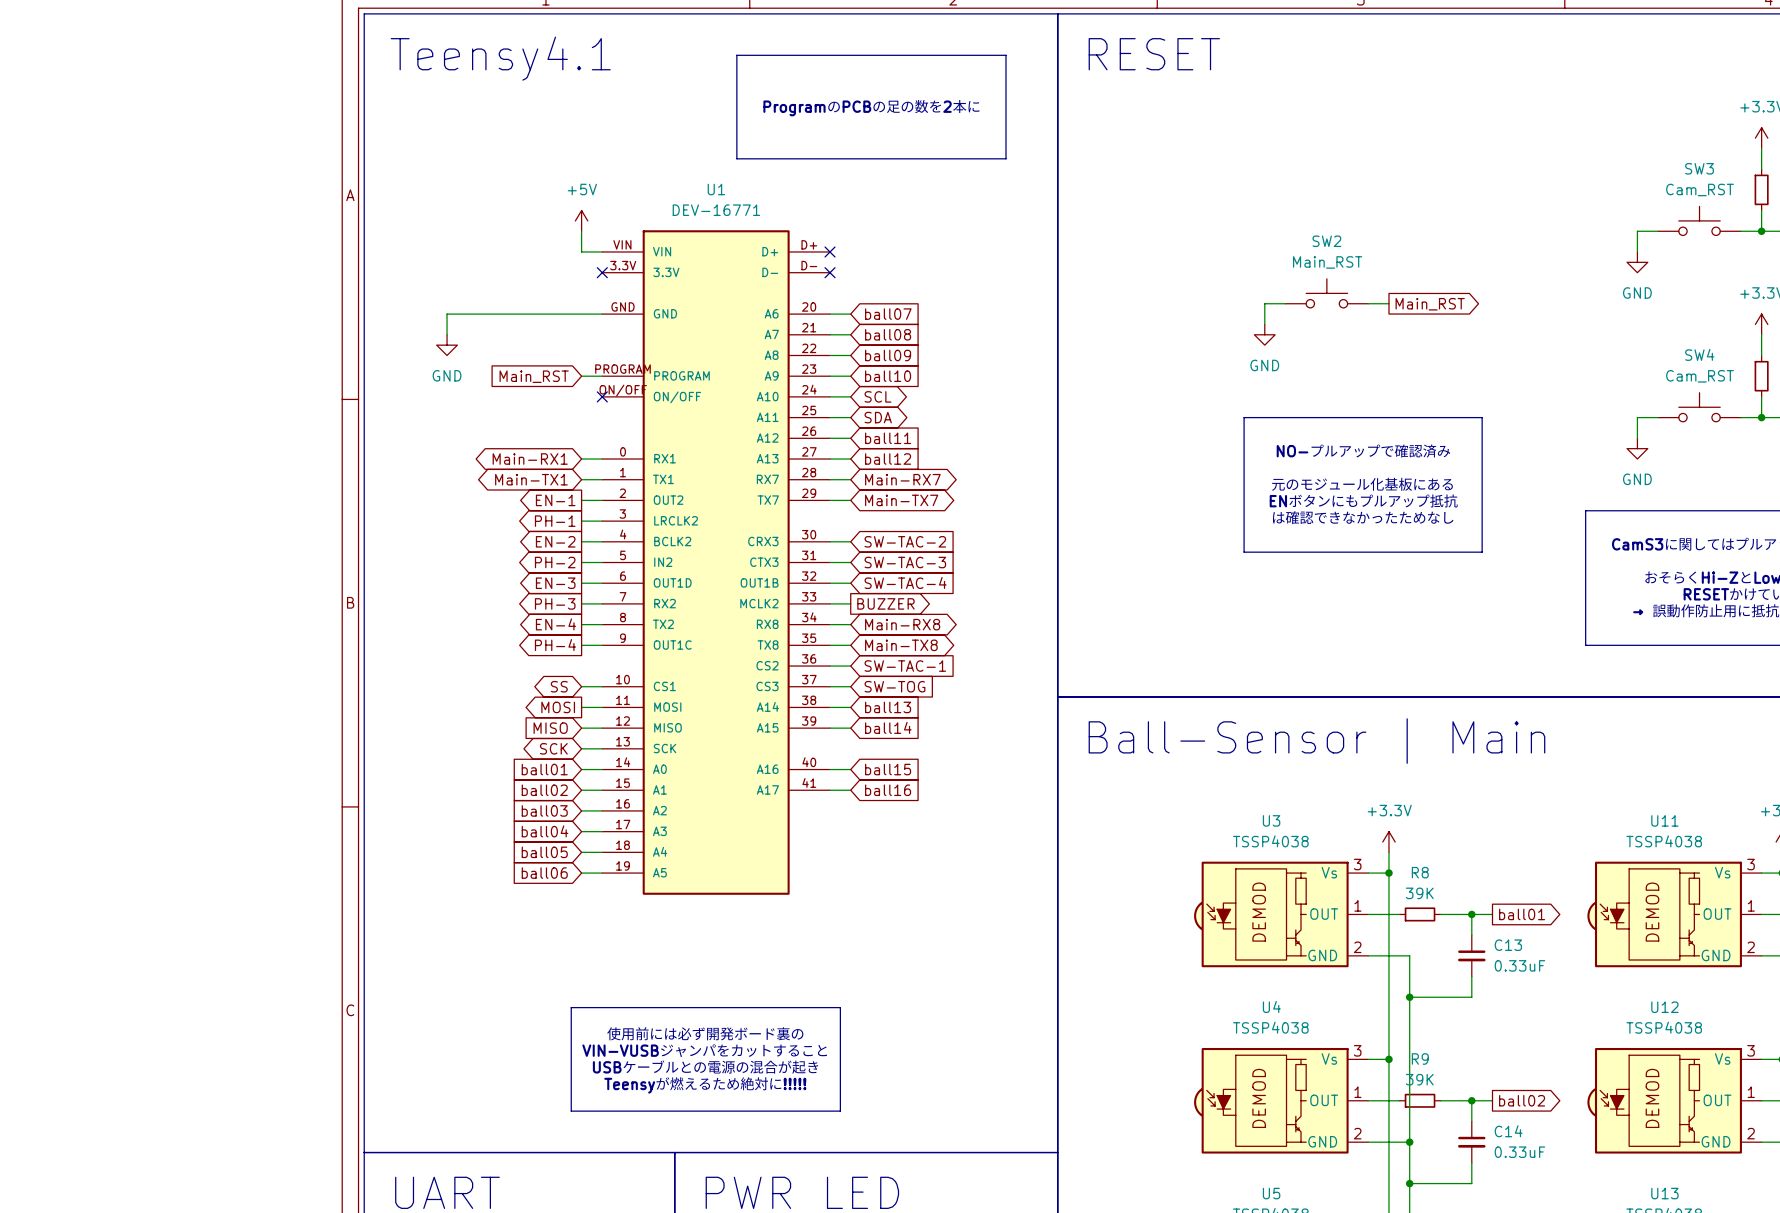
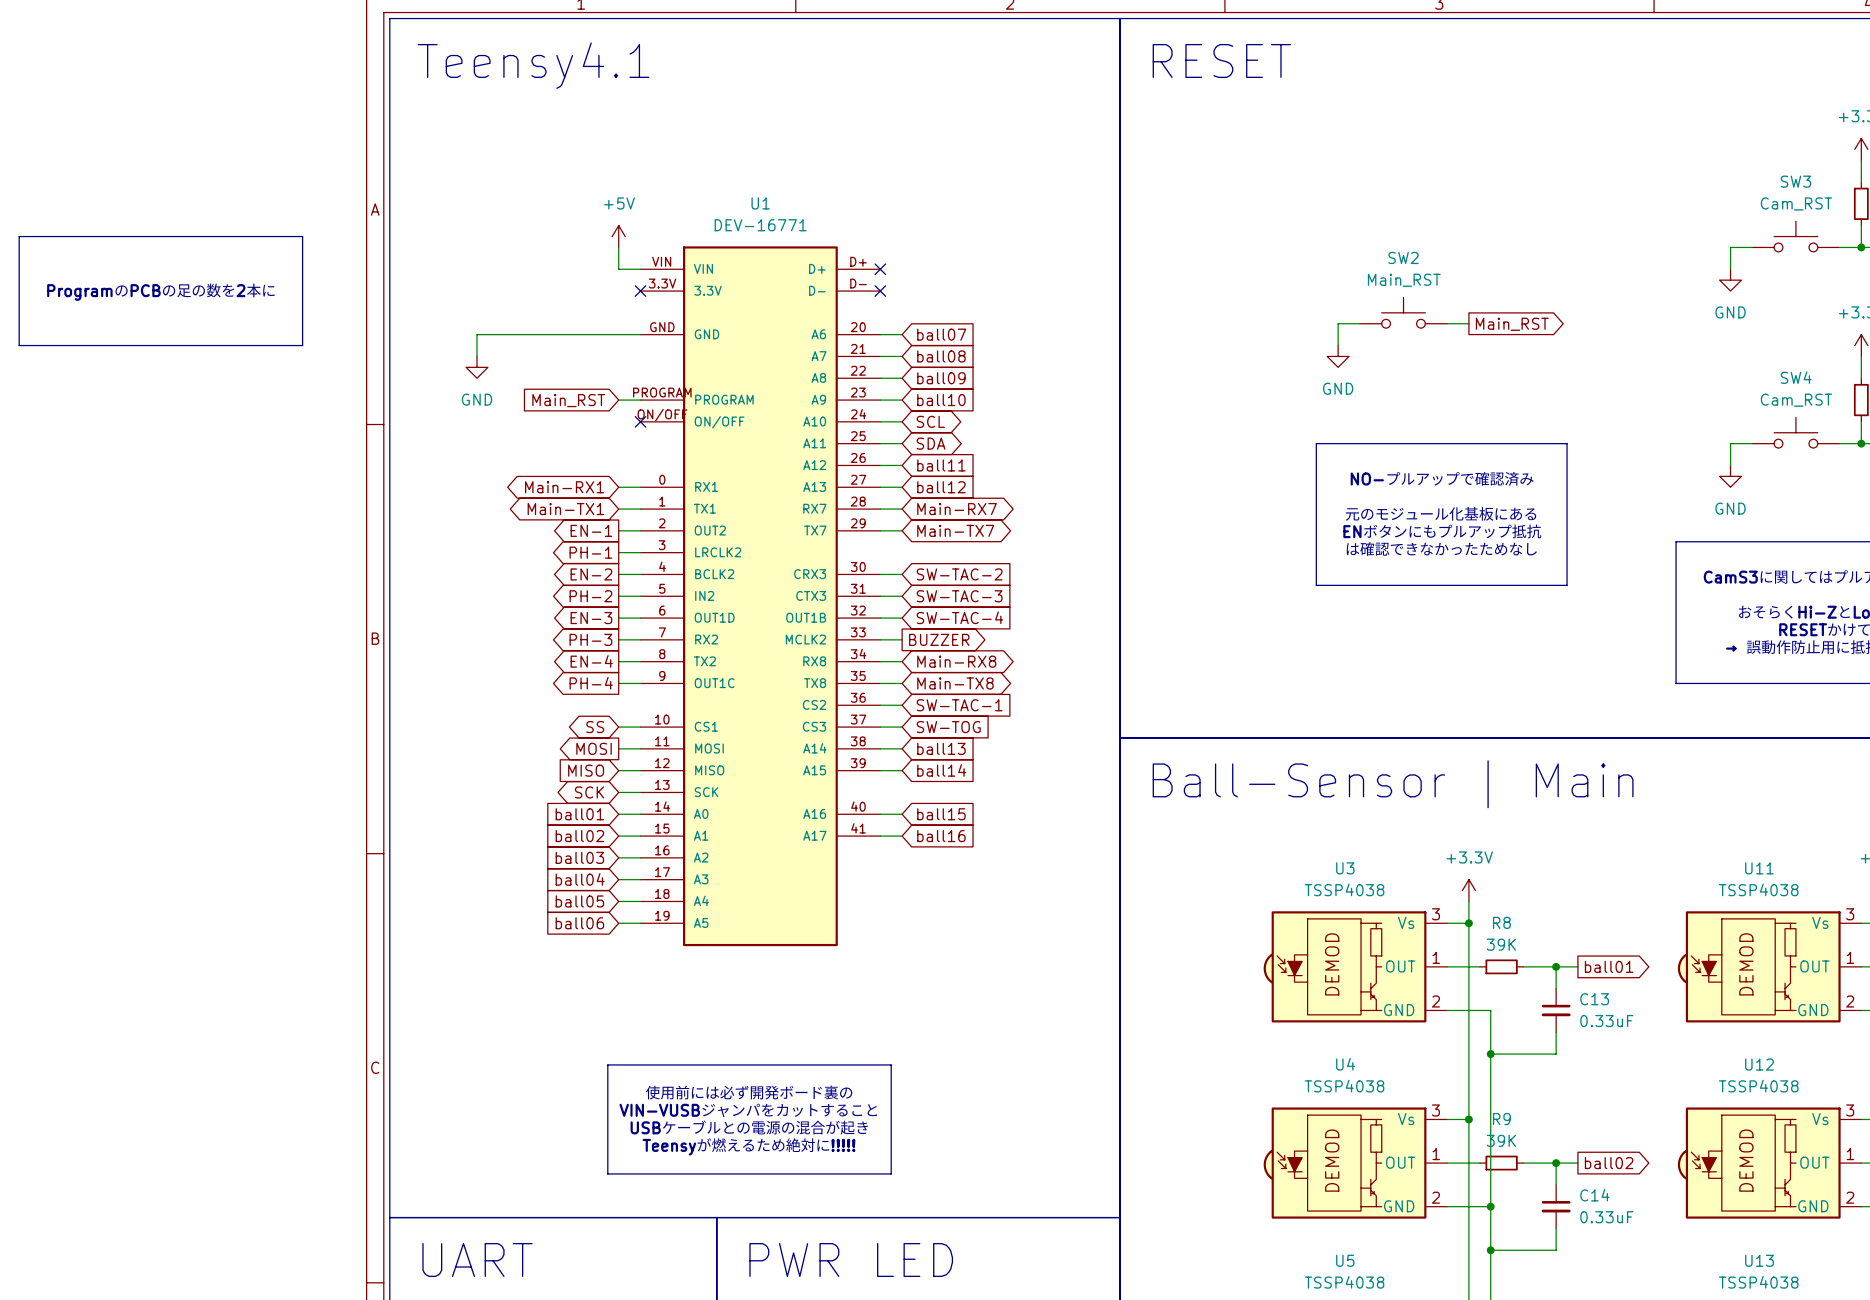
line: (736, 55) (1005, 55) (1005, 158) (736, 158) (736, 55) -> none
text: ProgramのPCBの足の数を2本に (871, 107) -> none
line: none -> (19, 236) (302, 236) (302, 345) (19, 345) (19, 236)
text: none -> ProgramのPCBの足の数を2本に (161, 291)

